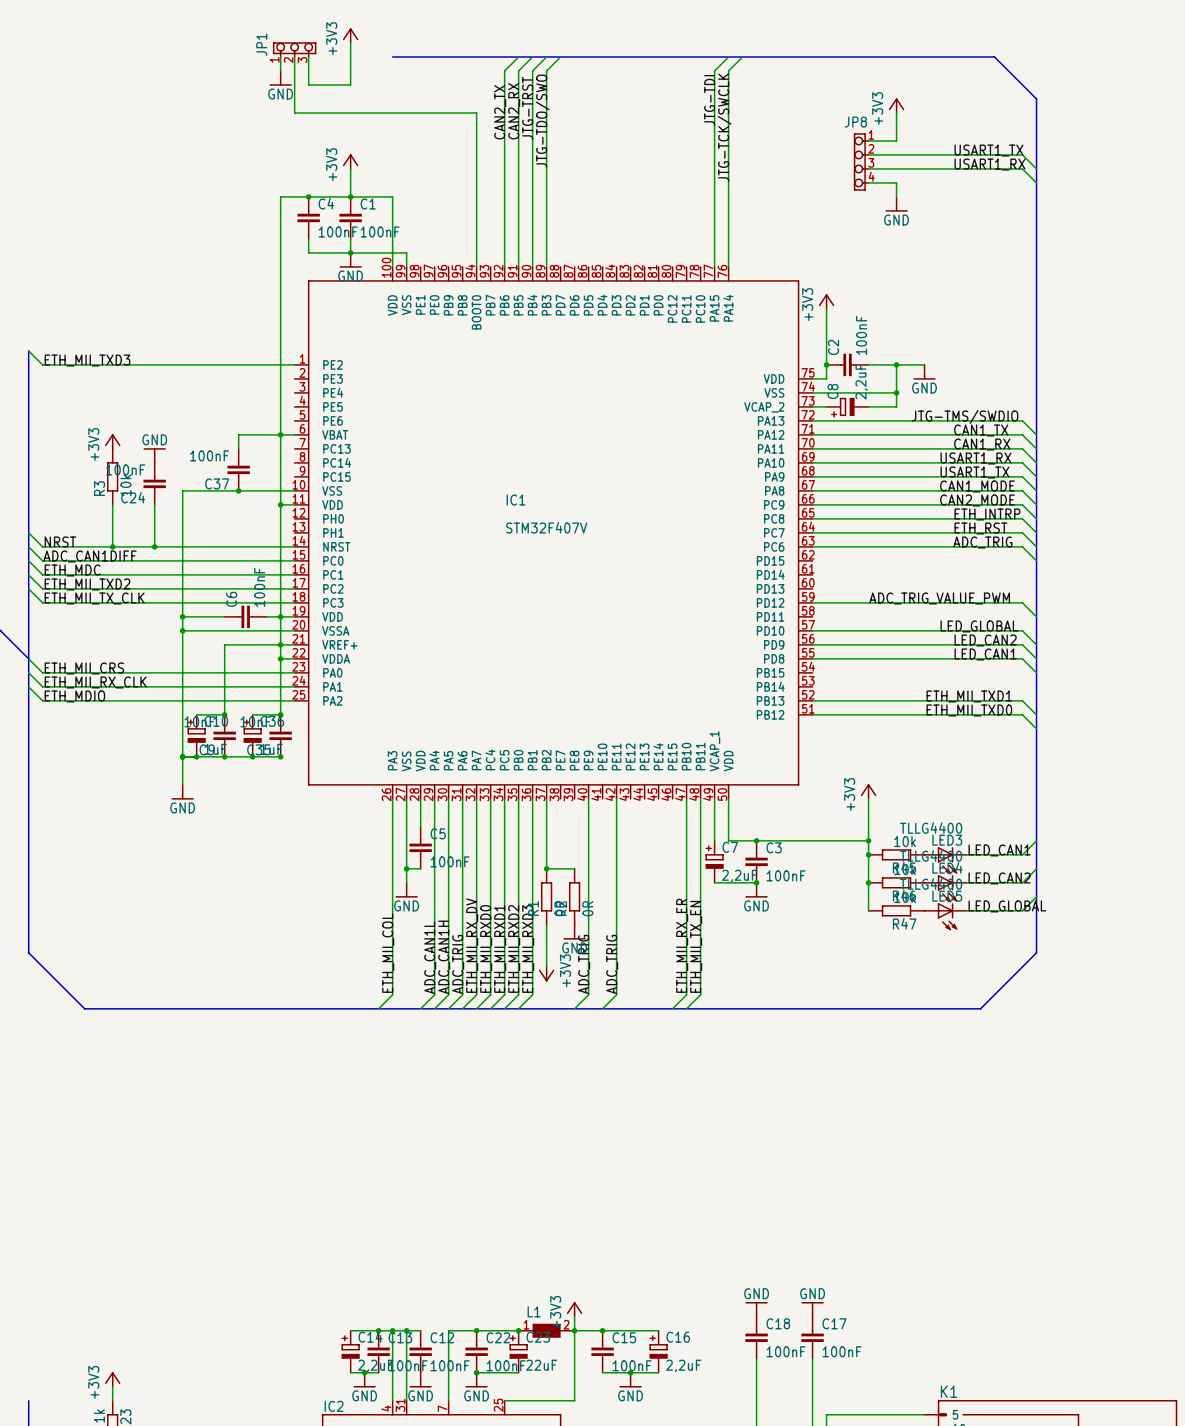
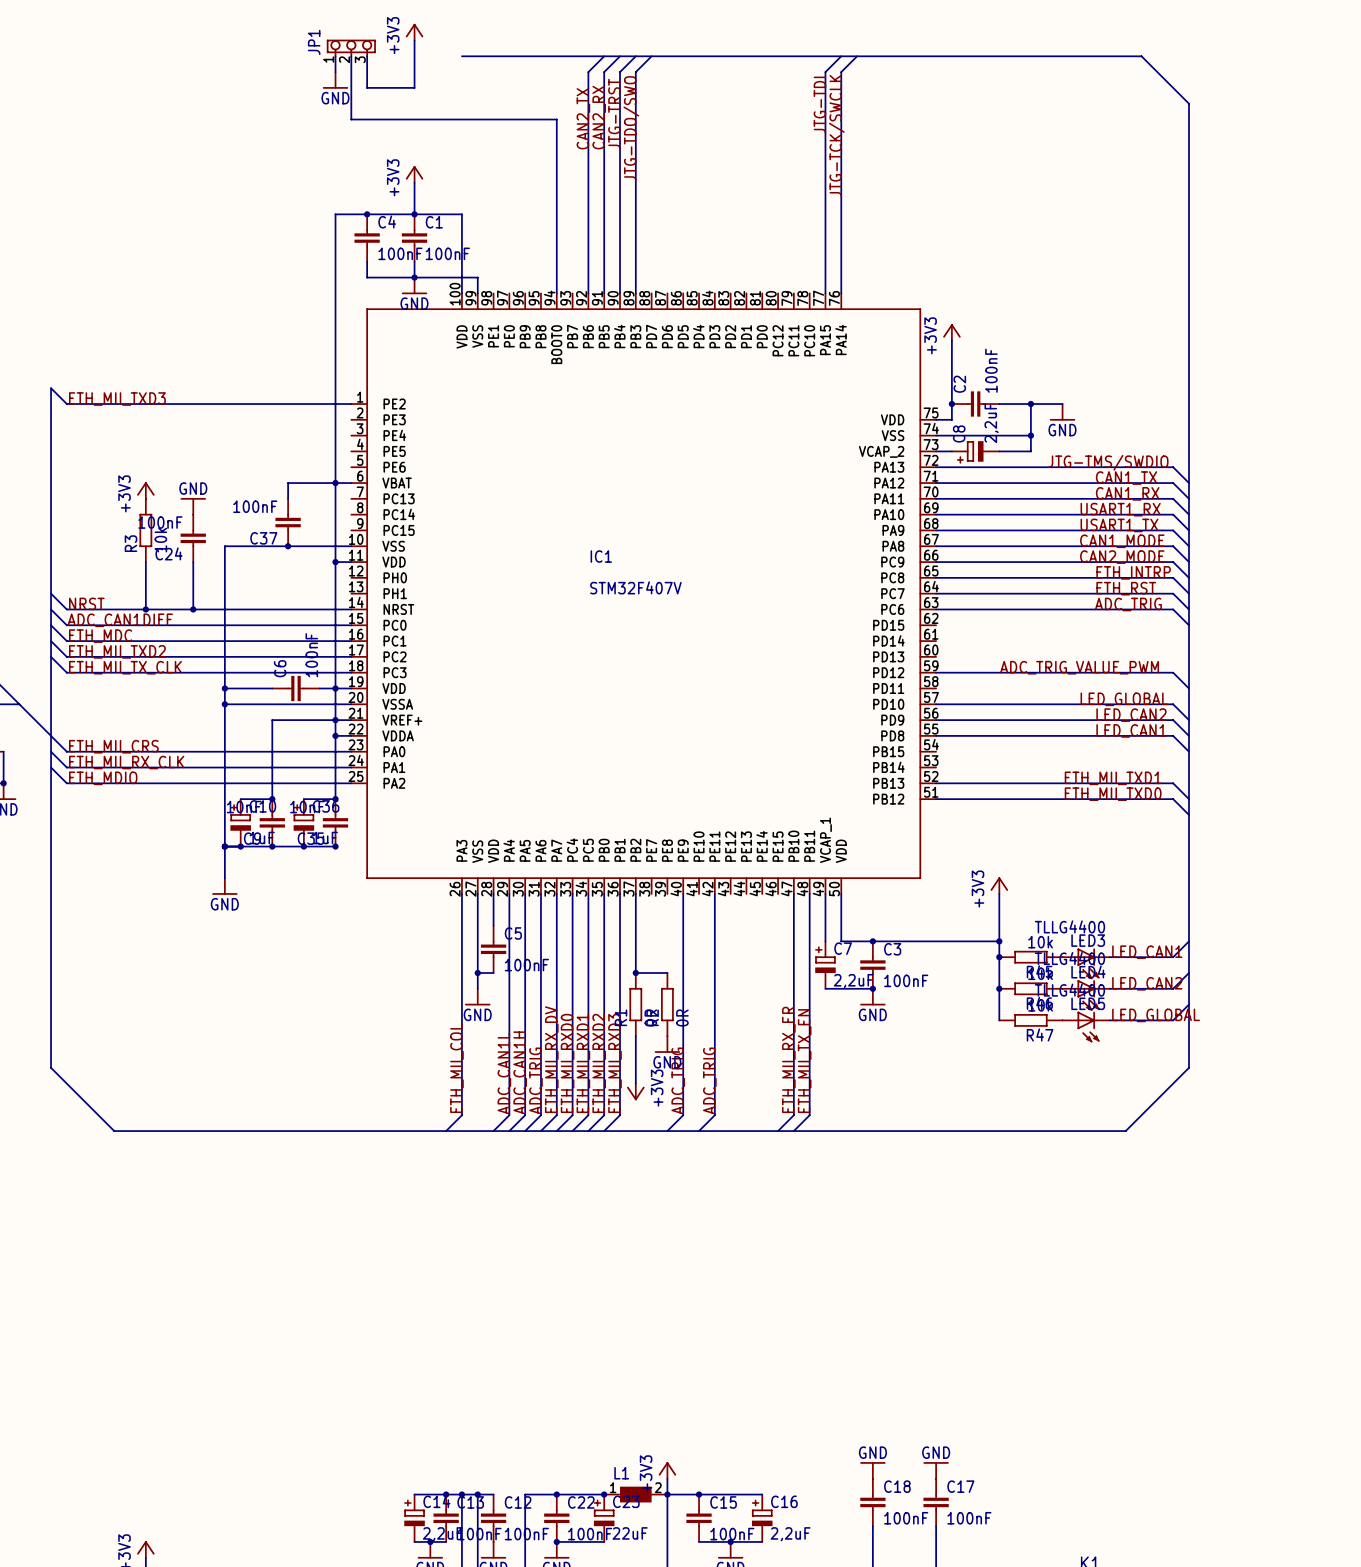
power symbol: +3V3 (896, 105) -> none
wire: (896, 112) (896, 140) (868, 140) -> none
label: USART1_TX (988, 150) -> none
wire: (868, 154) (1022, 154) (1036, 168) -> none
JP8: (861, 161) -> none
label: USART1_RX (990, 164) -> none
wire: (868, 168) (1022, 168) (1036, 182) -> none
wire: (868, 182) (896, 182) (896, 196) -> none
power symbol: GND (896, 204) -> none

